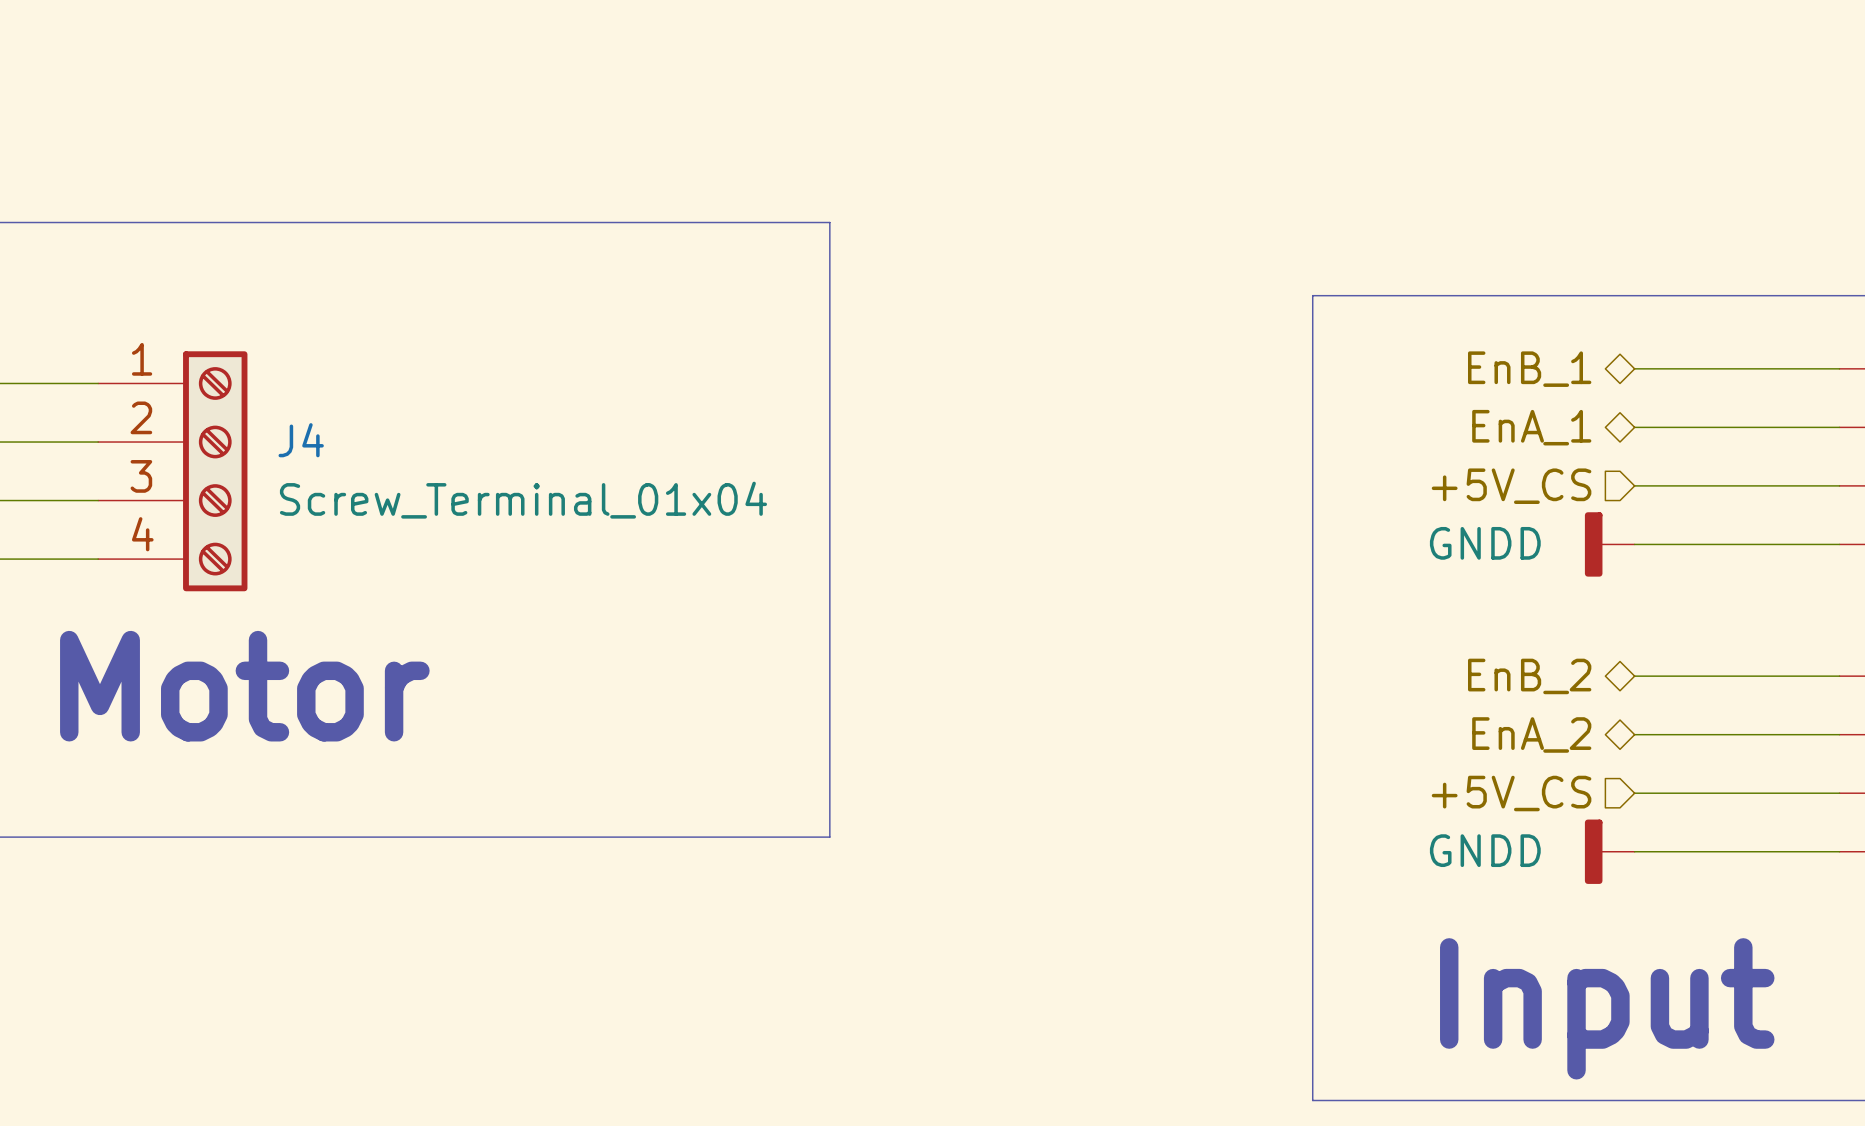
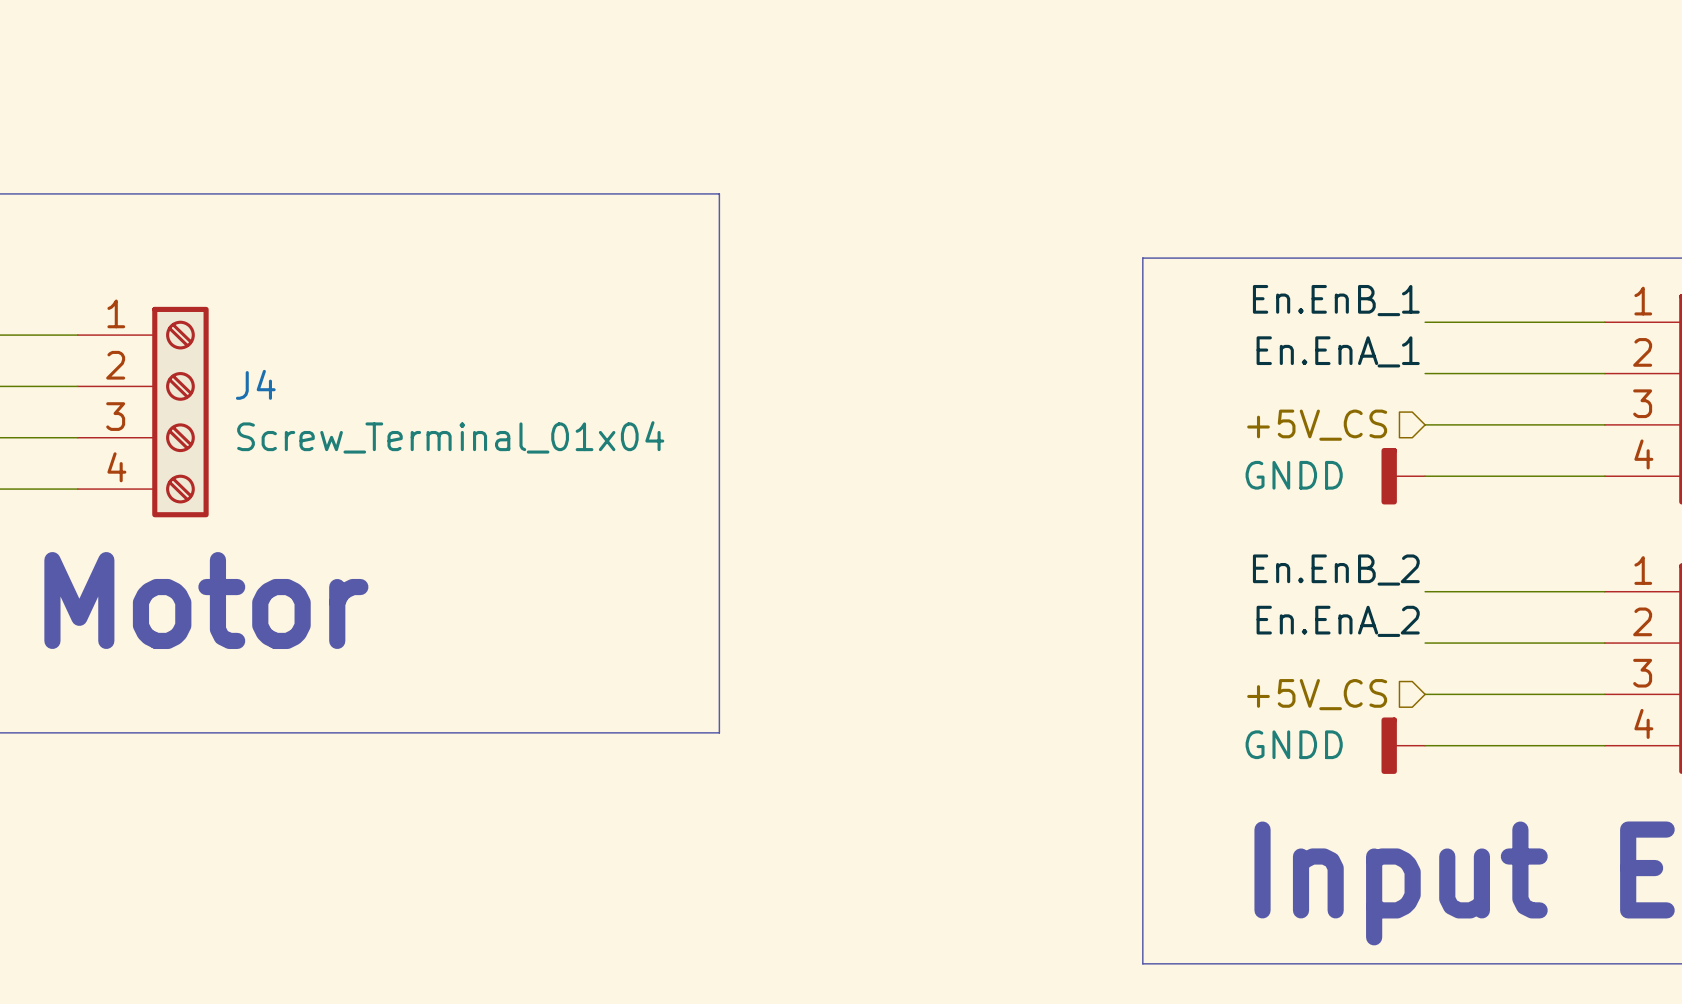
label: none -> En.EnB_1 (1336, 300)
hierarchical label: EnB_1 (1529, 369) -> none
label: none -> En.EnA_1 (1338, 351)
hierarchical label: EnA_1 (1531, 427) -> none
label: none -> En.EnB_2 (1336, 570)
hierarchical label: EnB_2 (1529, 676) -> none
label: none -> En.EnA_2 (1338, 621)
hierarchical label: EnA_2 (1531, 734) -> none

